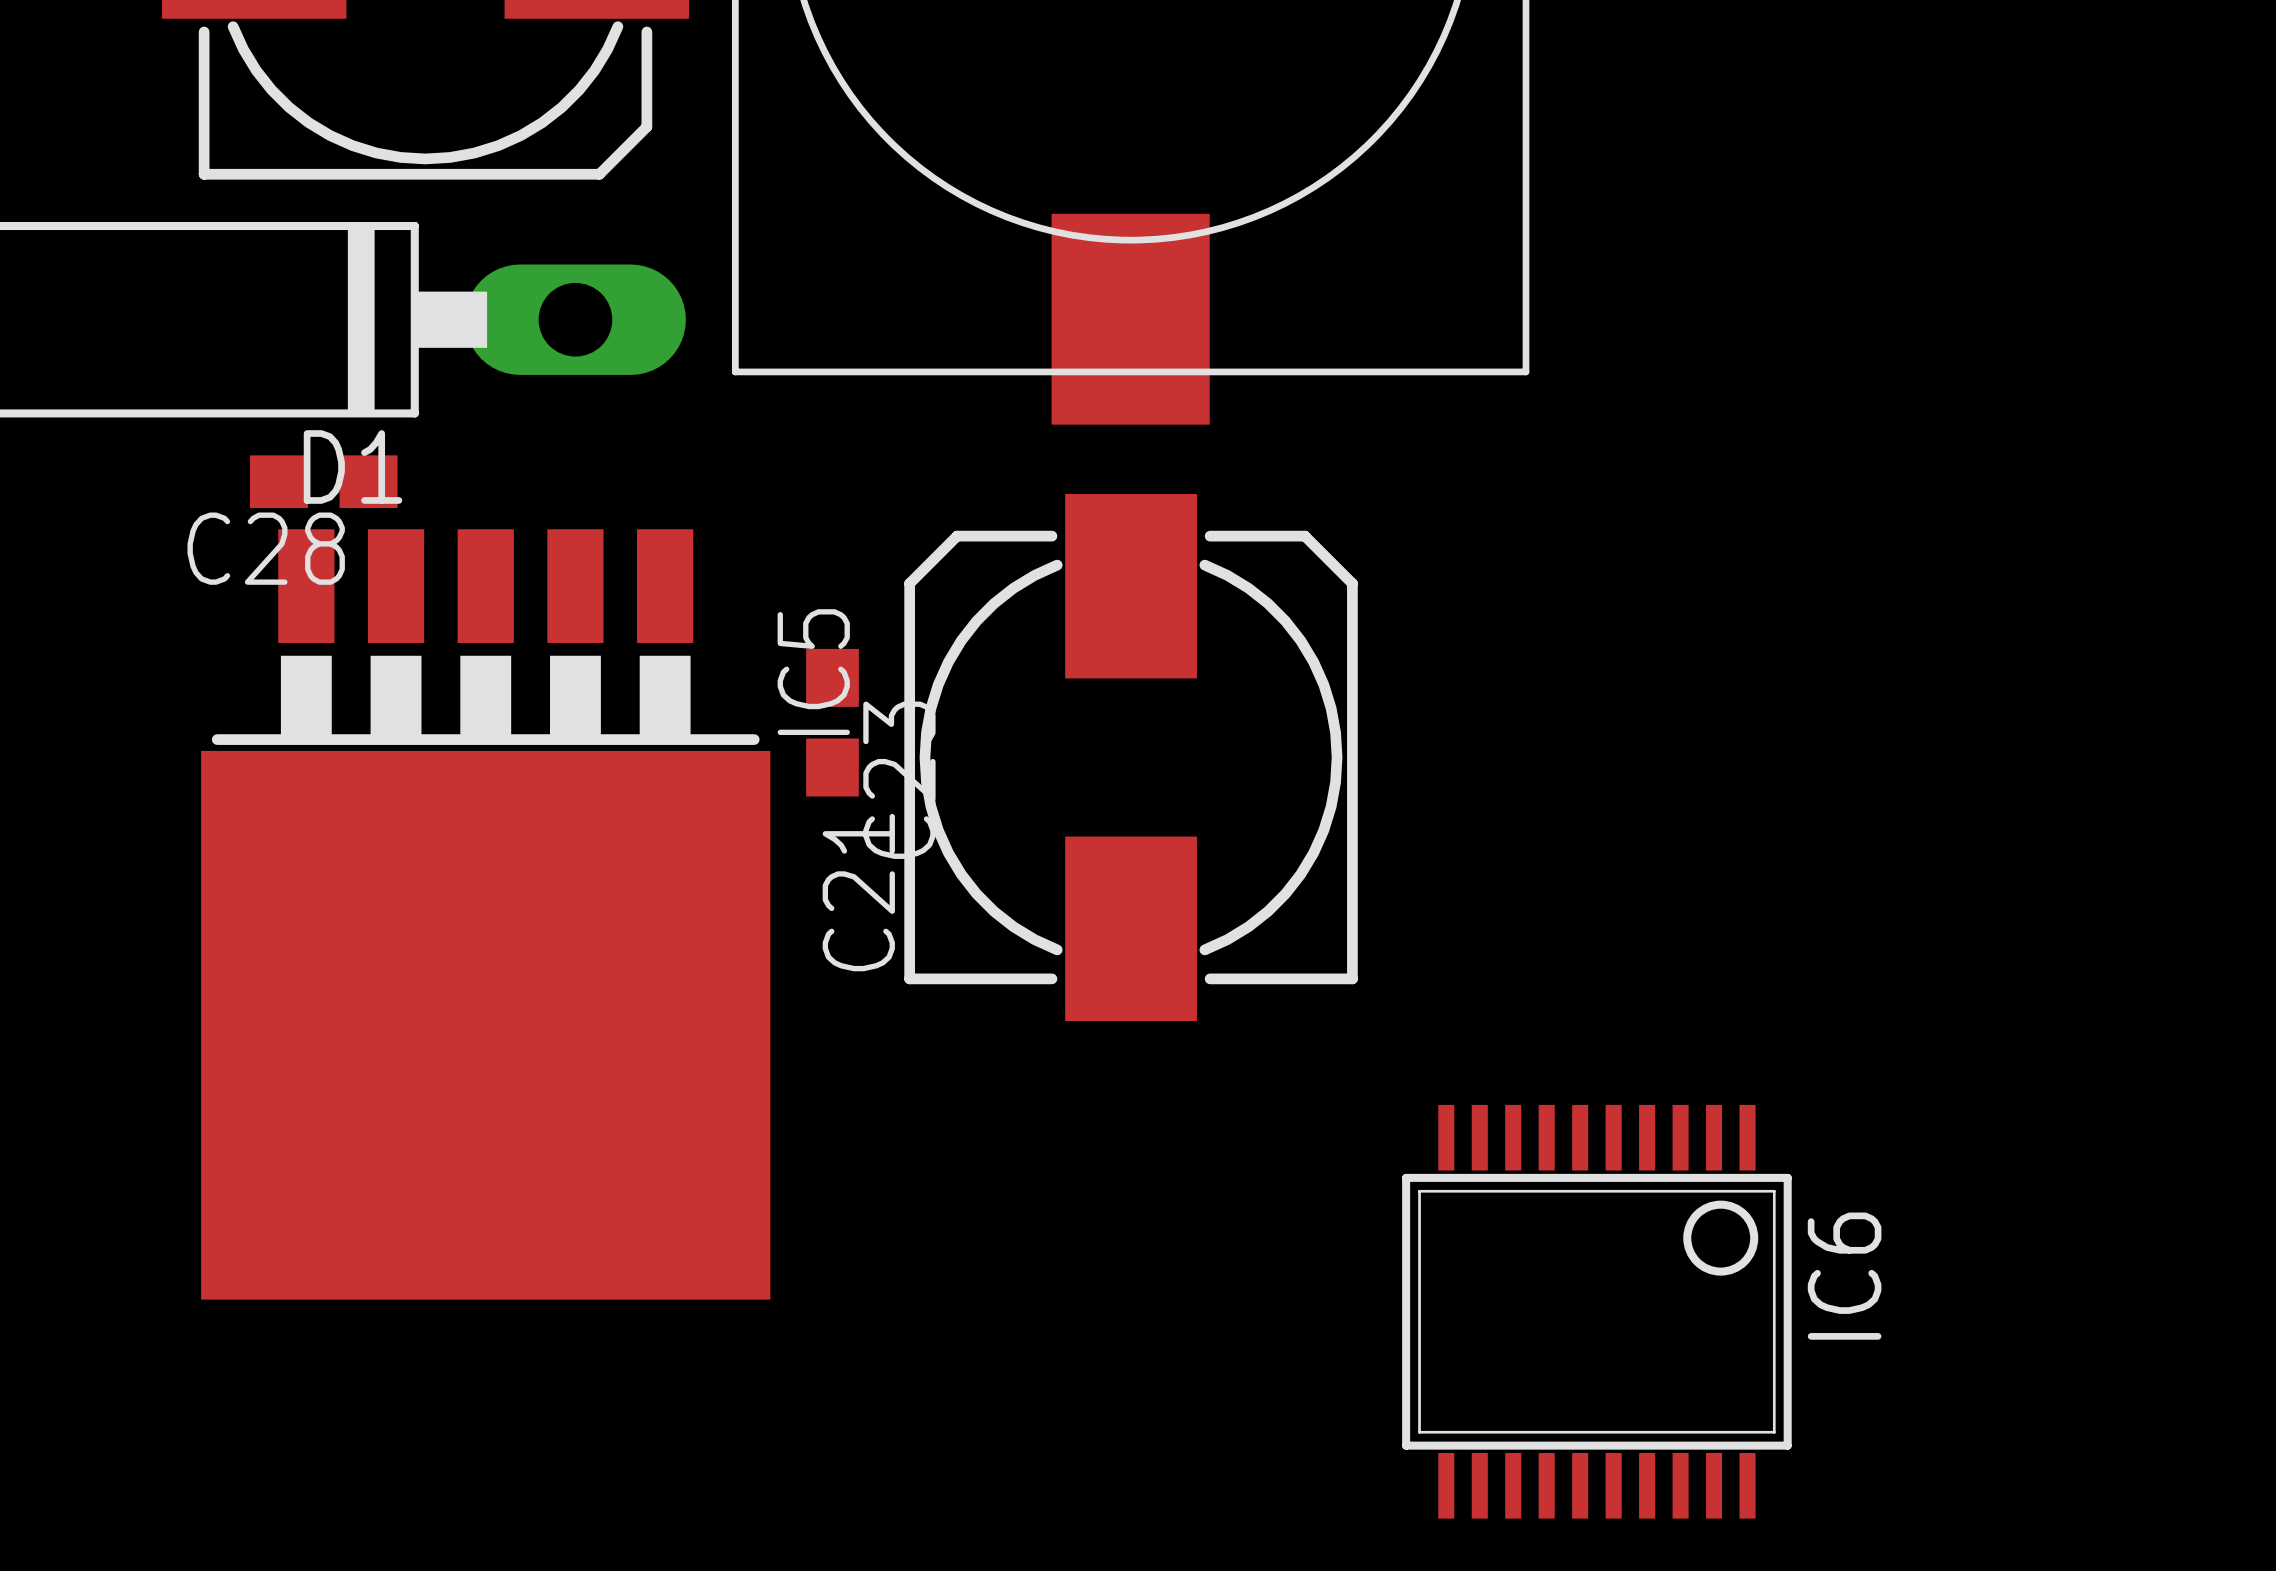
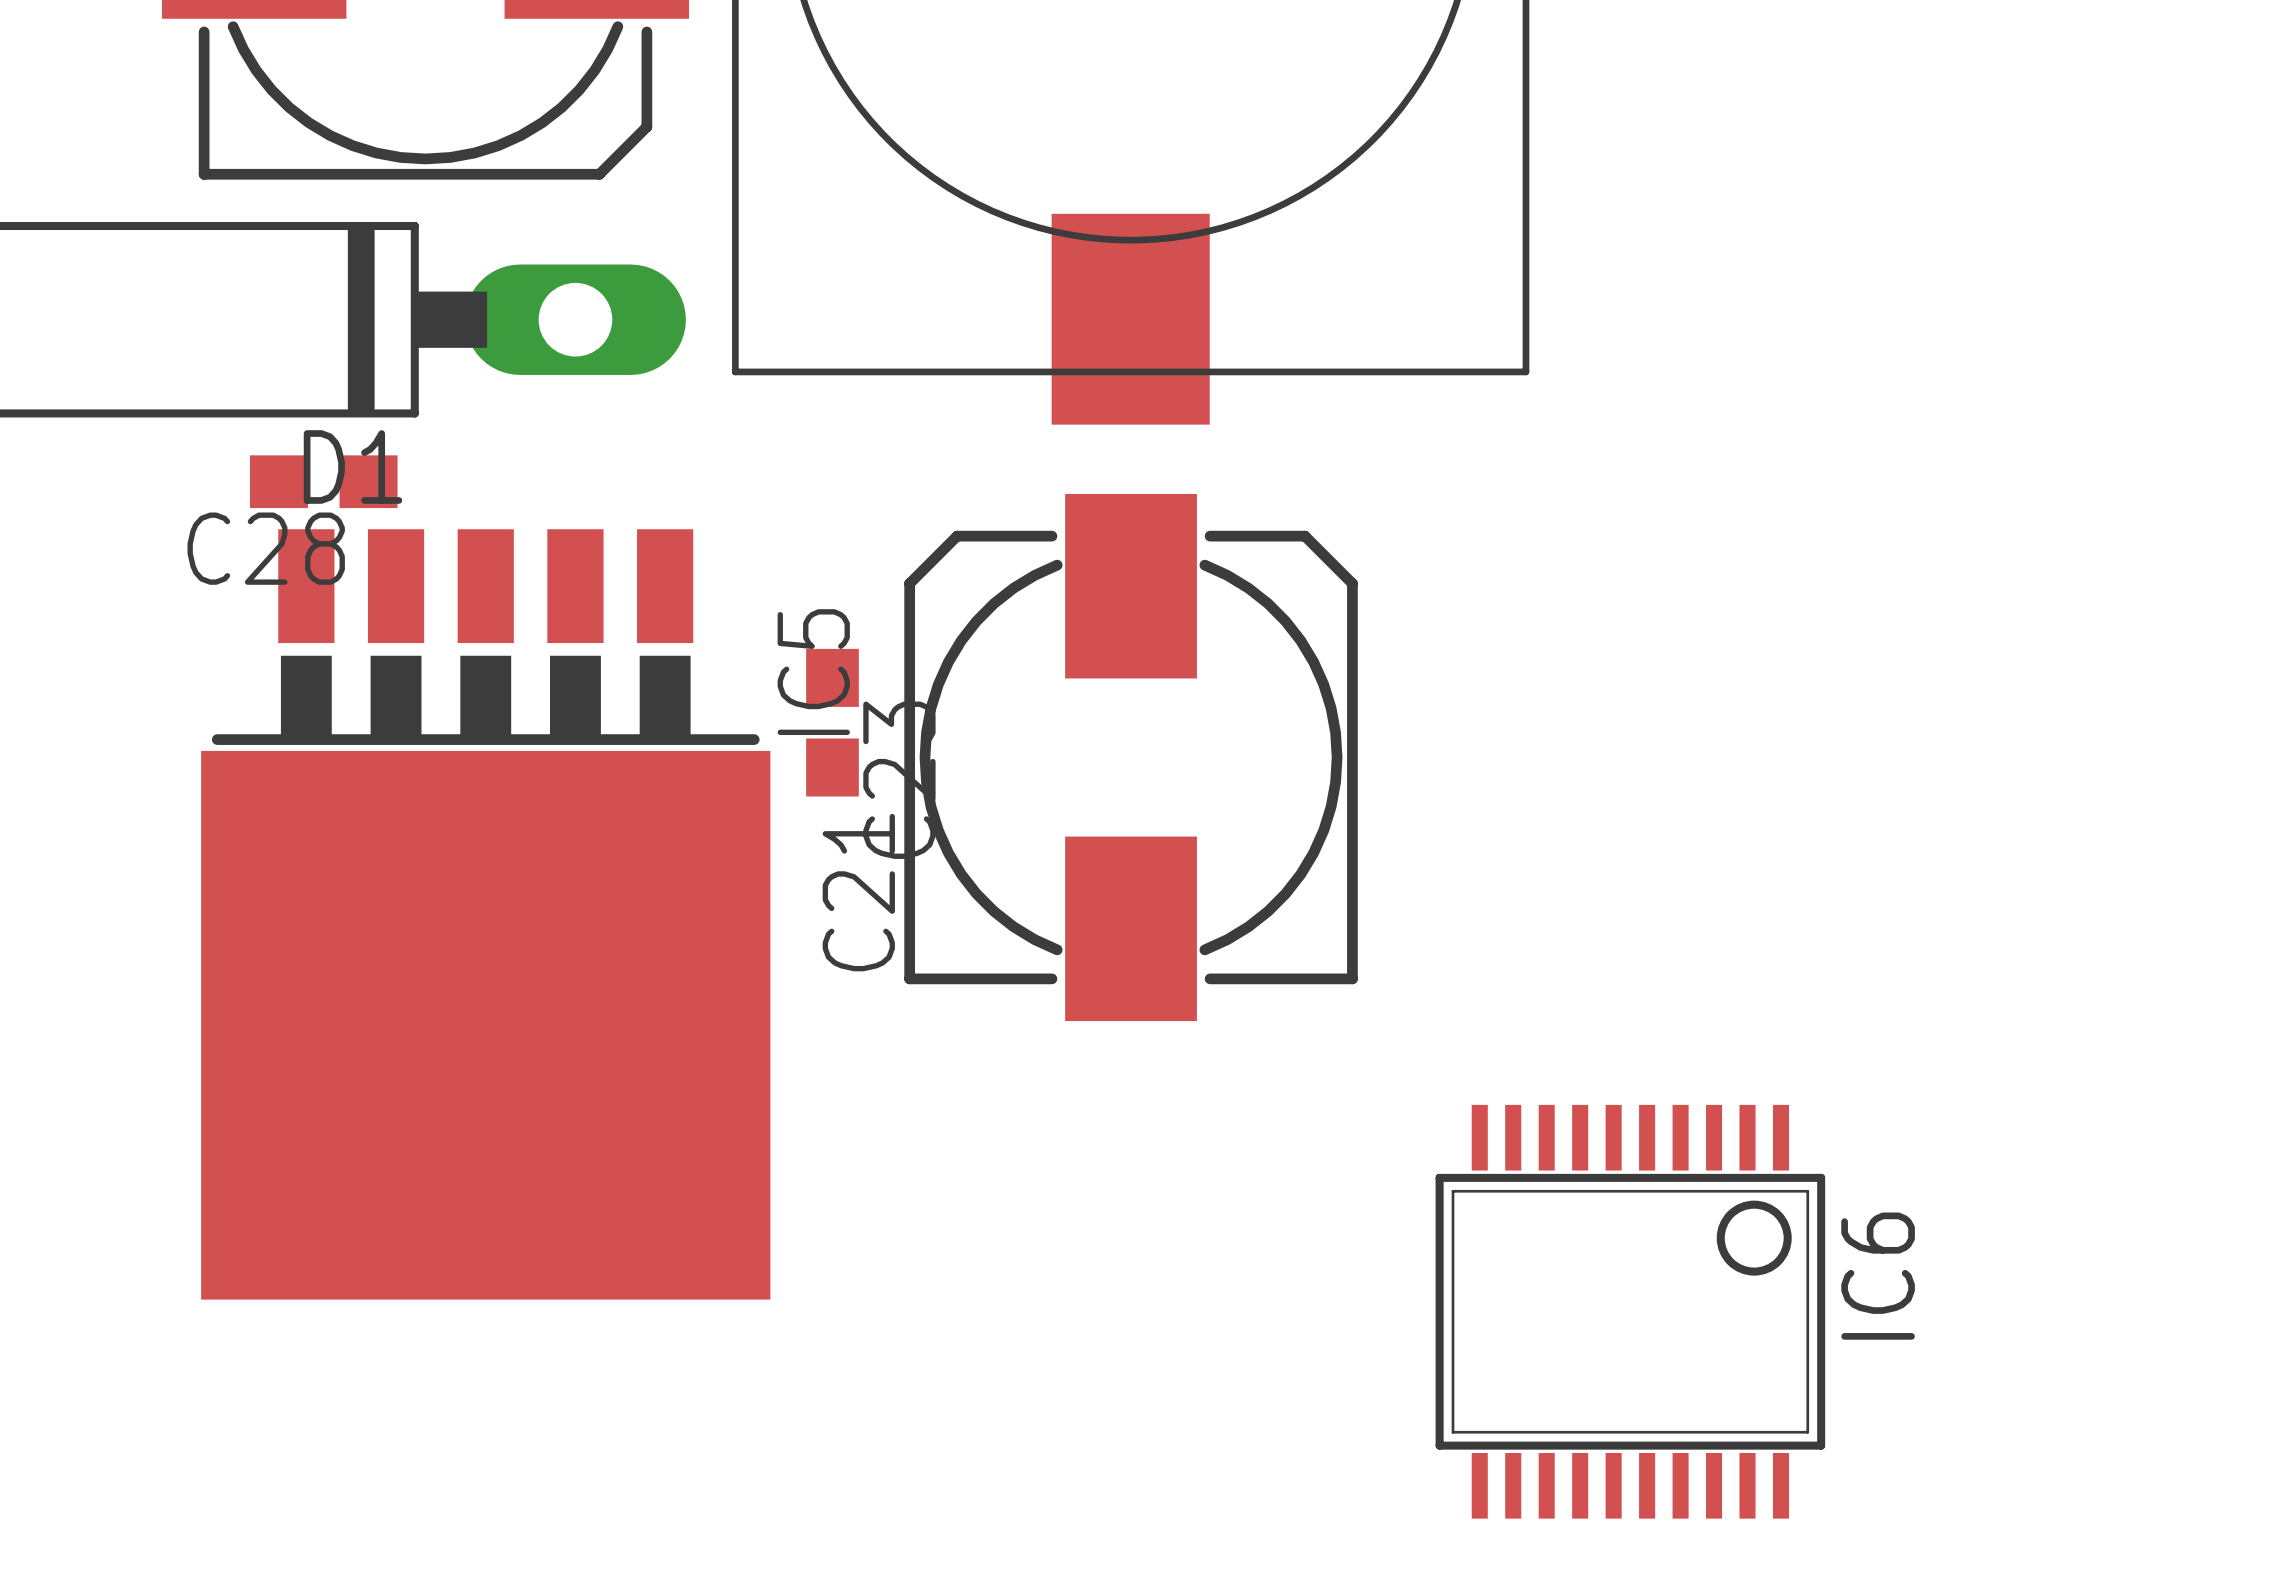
IC6 position: (1596, 1311) -> (1630, 1311)

